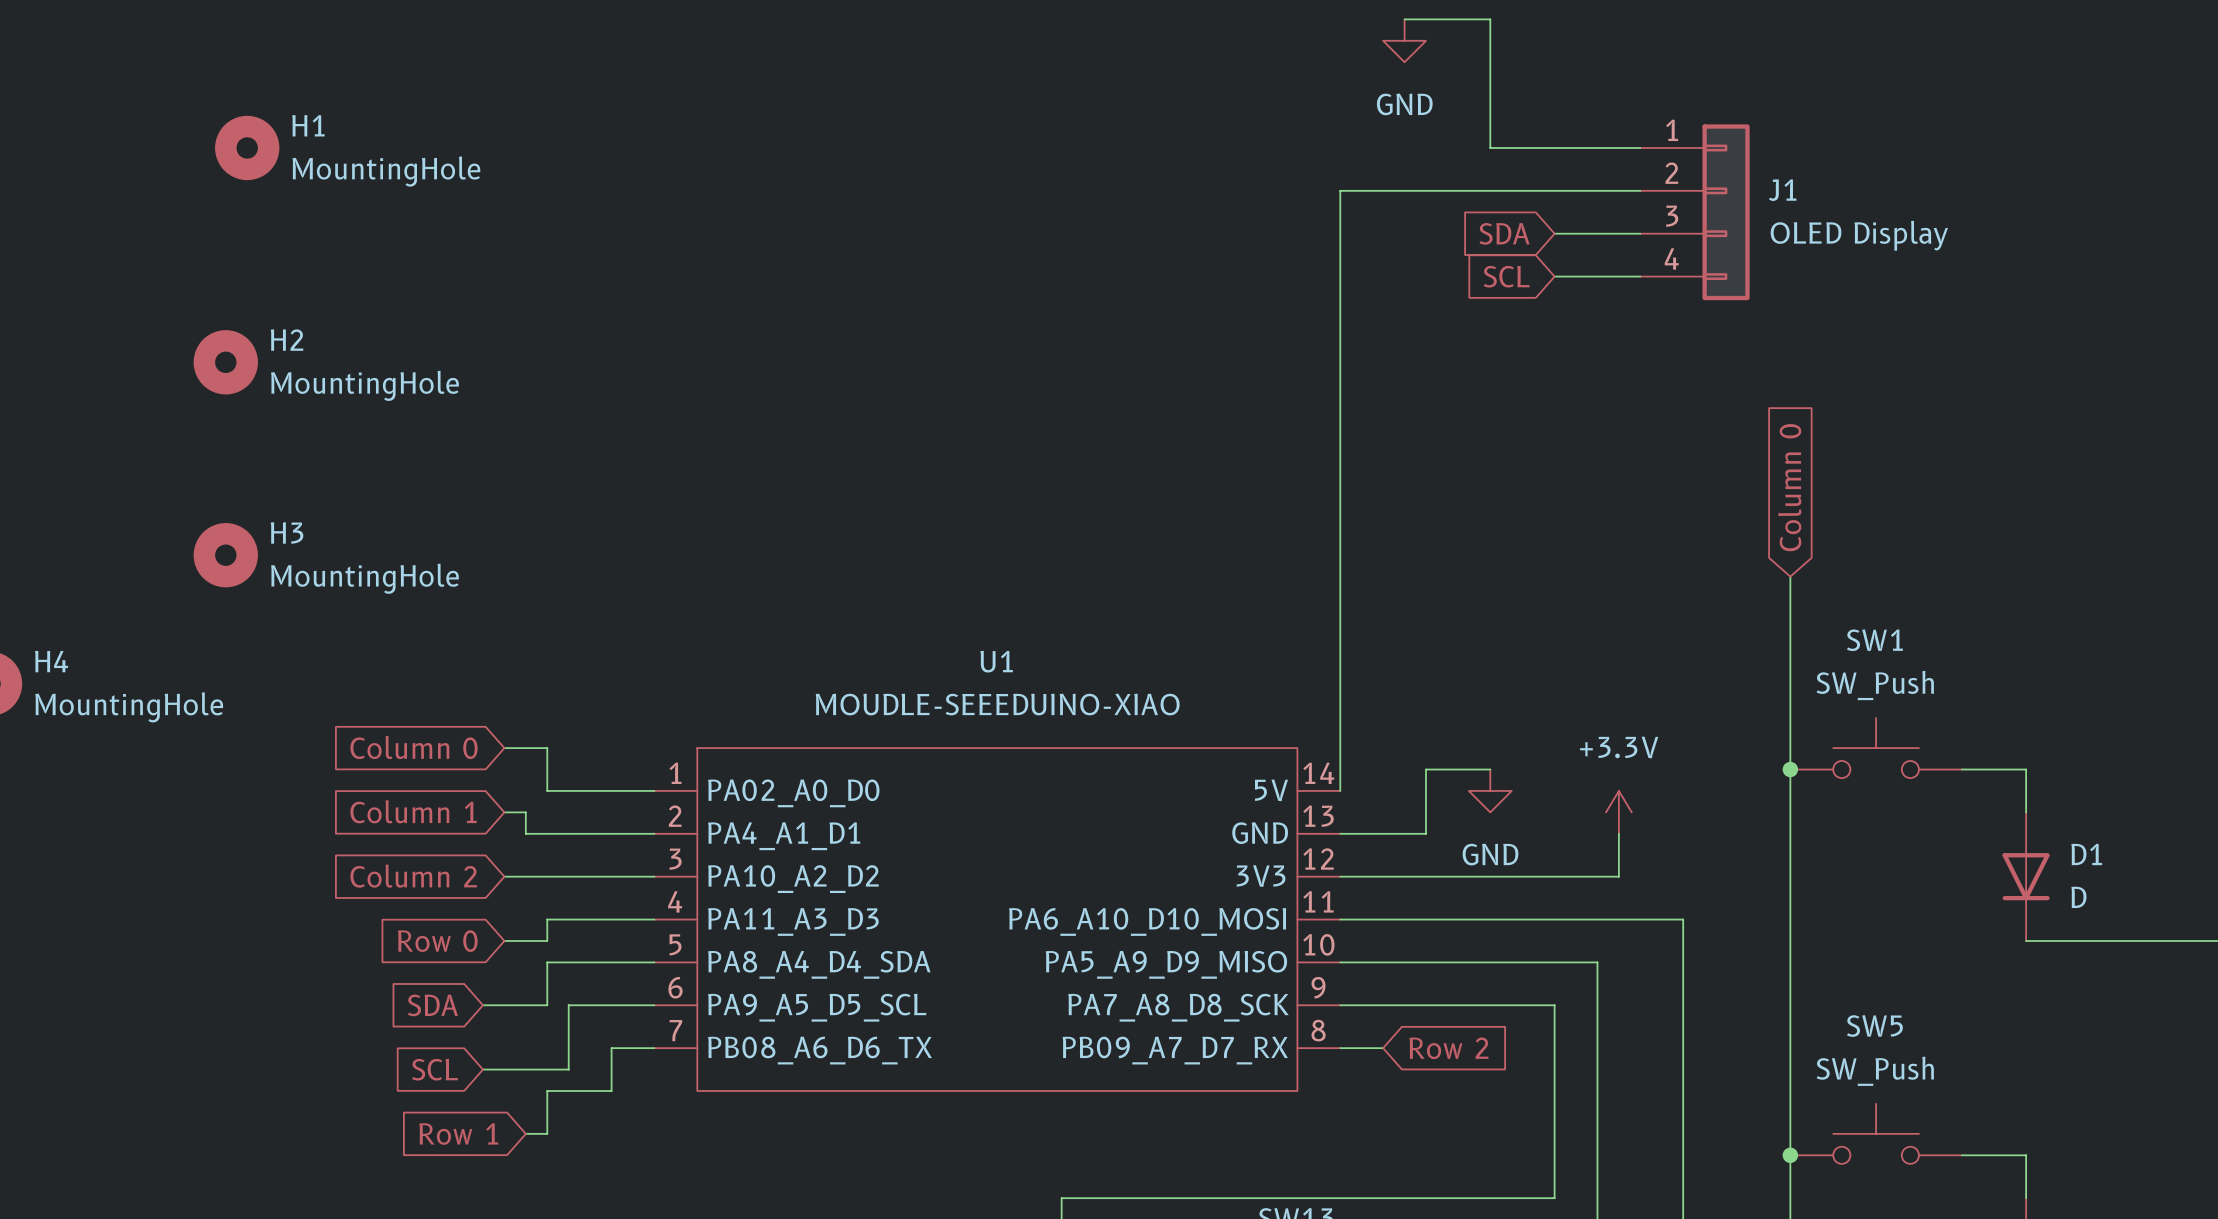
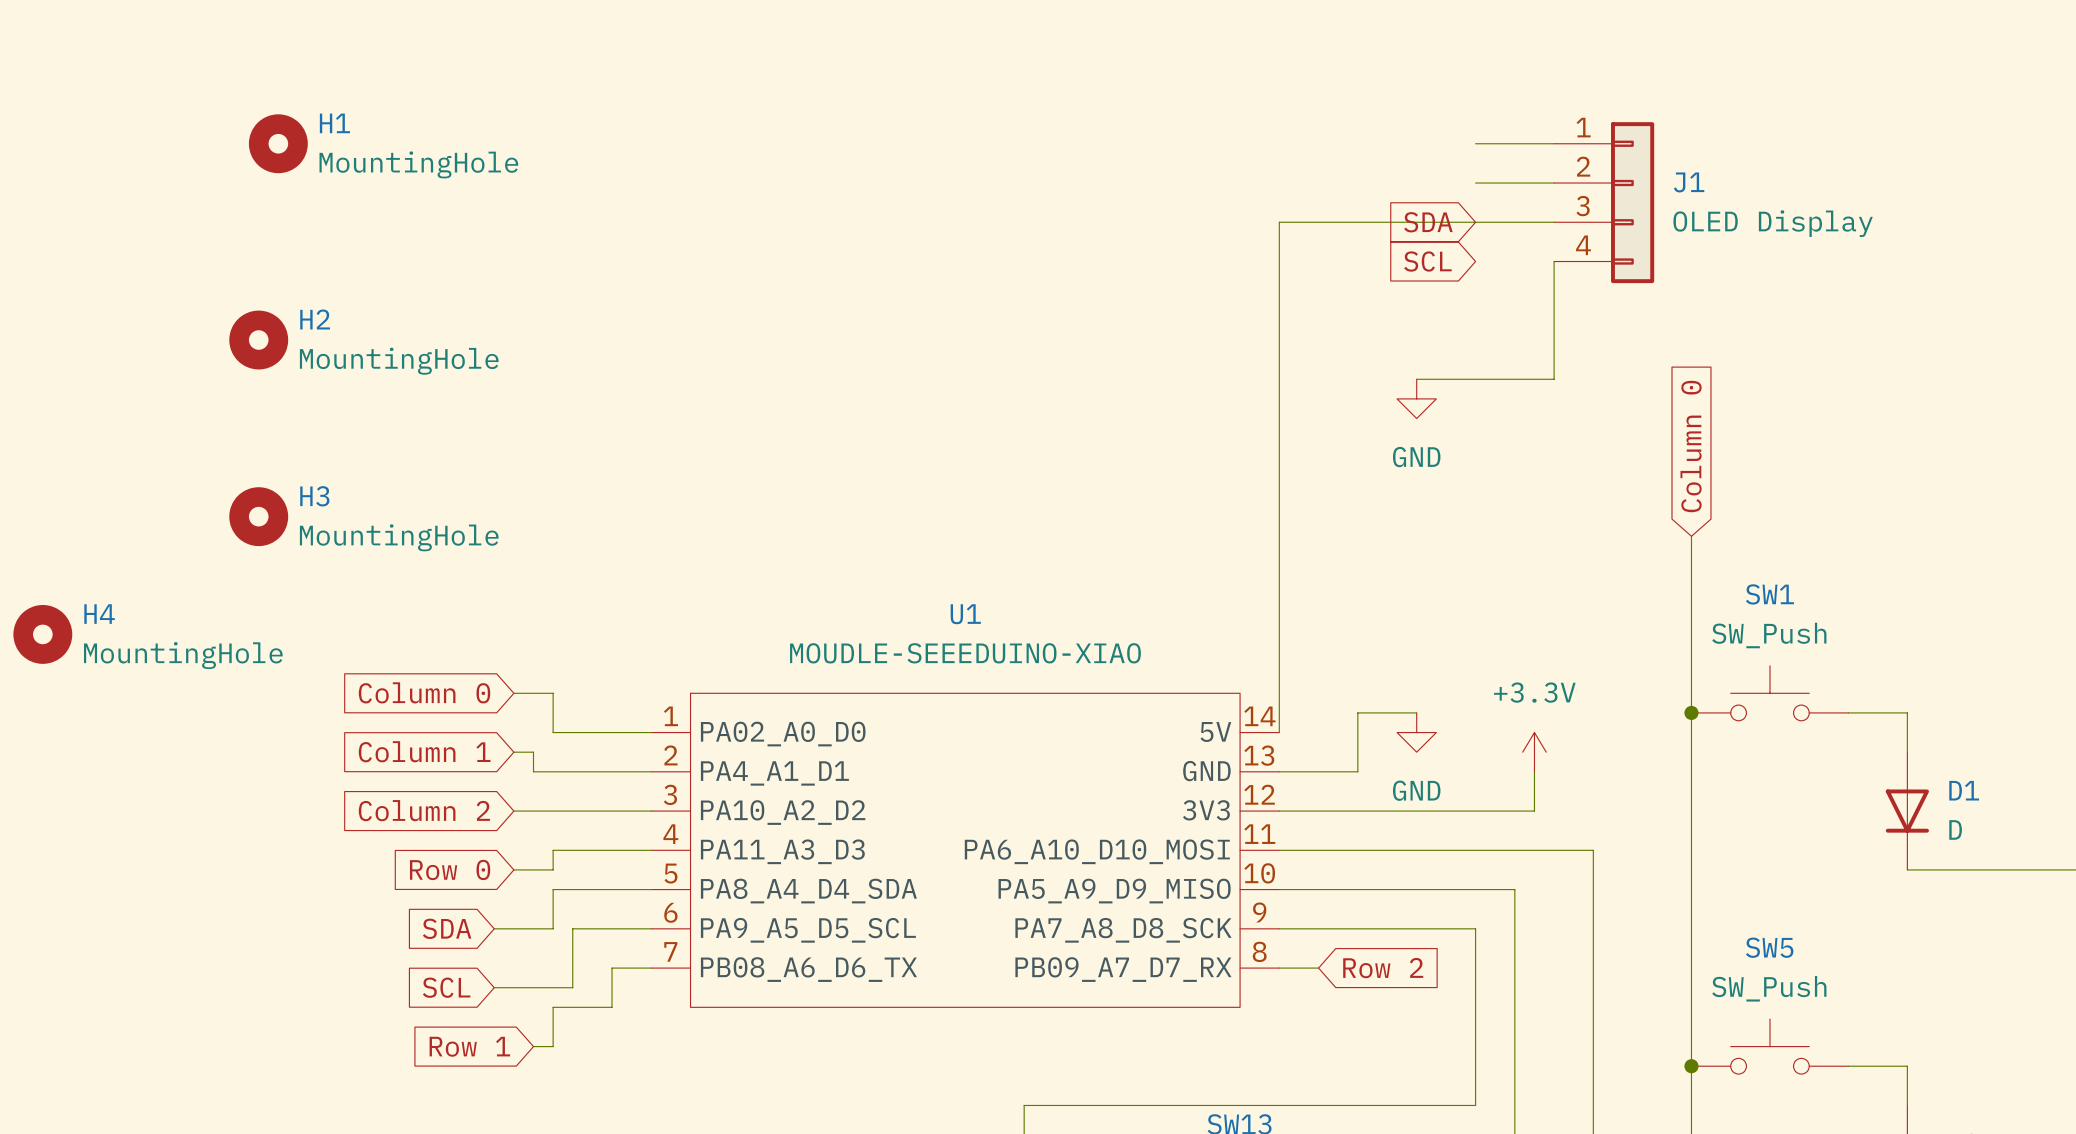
wire: (1404, 19) (1490, 19) (1490, 147) (1554, 147) -> none
power symbol position: GND (1404, 40) -> GND (1416, 398)
wire: (1554, 190) (1340, 190) (1340, 233) -> (1475, 222) (1279, 222)
wire: (1554, 276) (1640, 276) -> (1416, 379) (1554, 379) (1554, 261)

